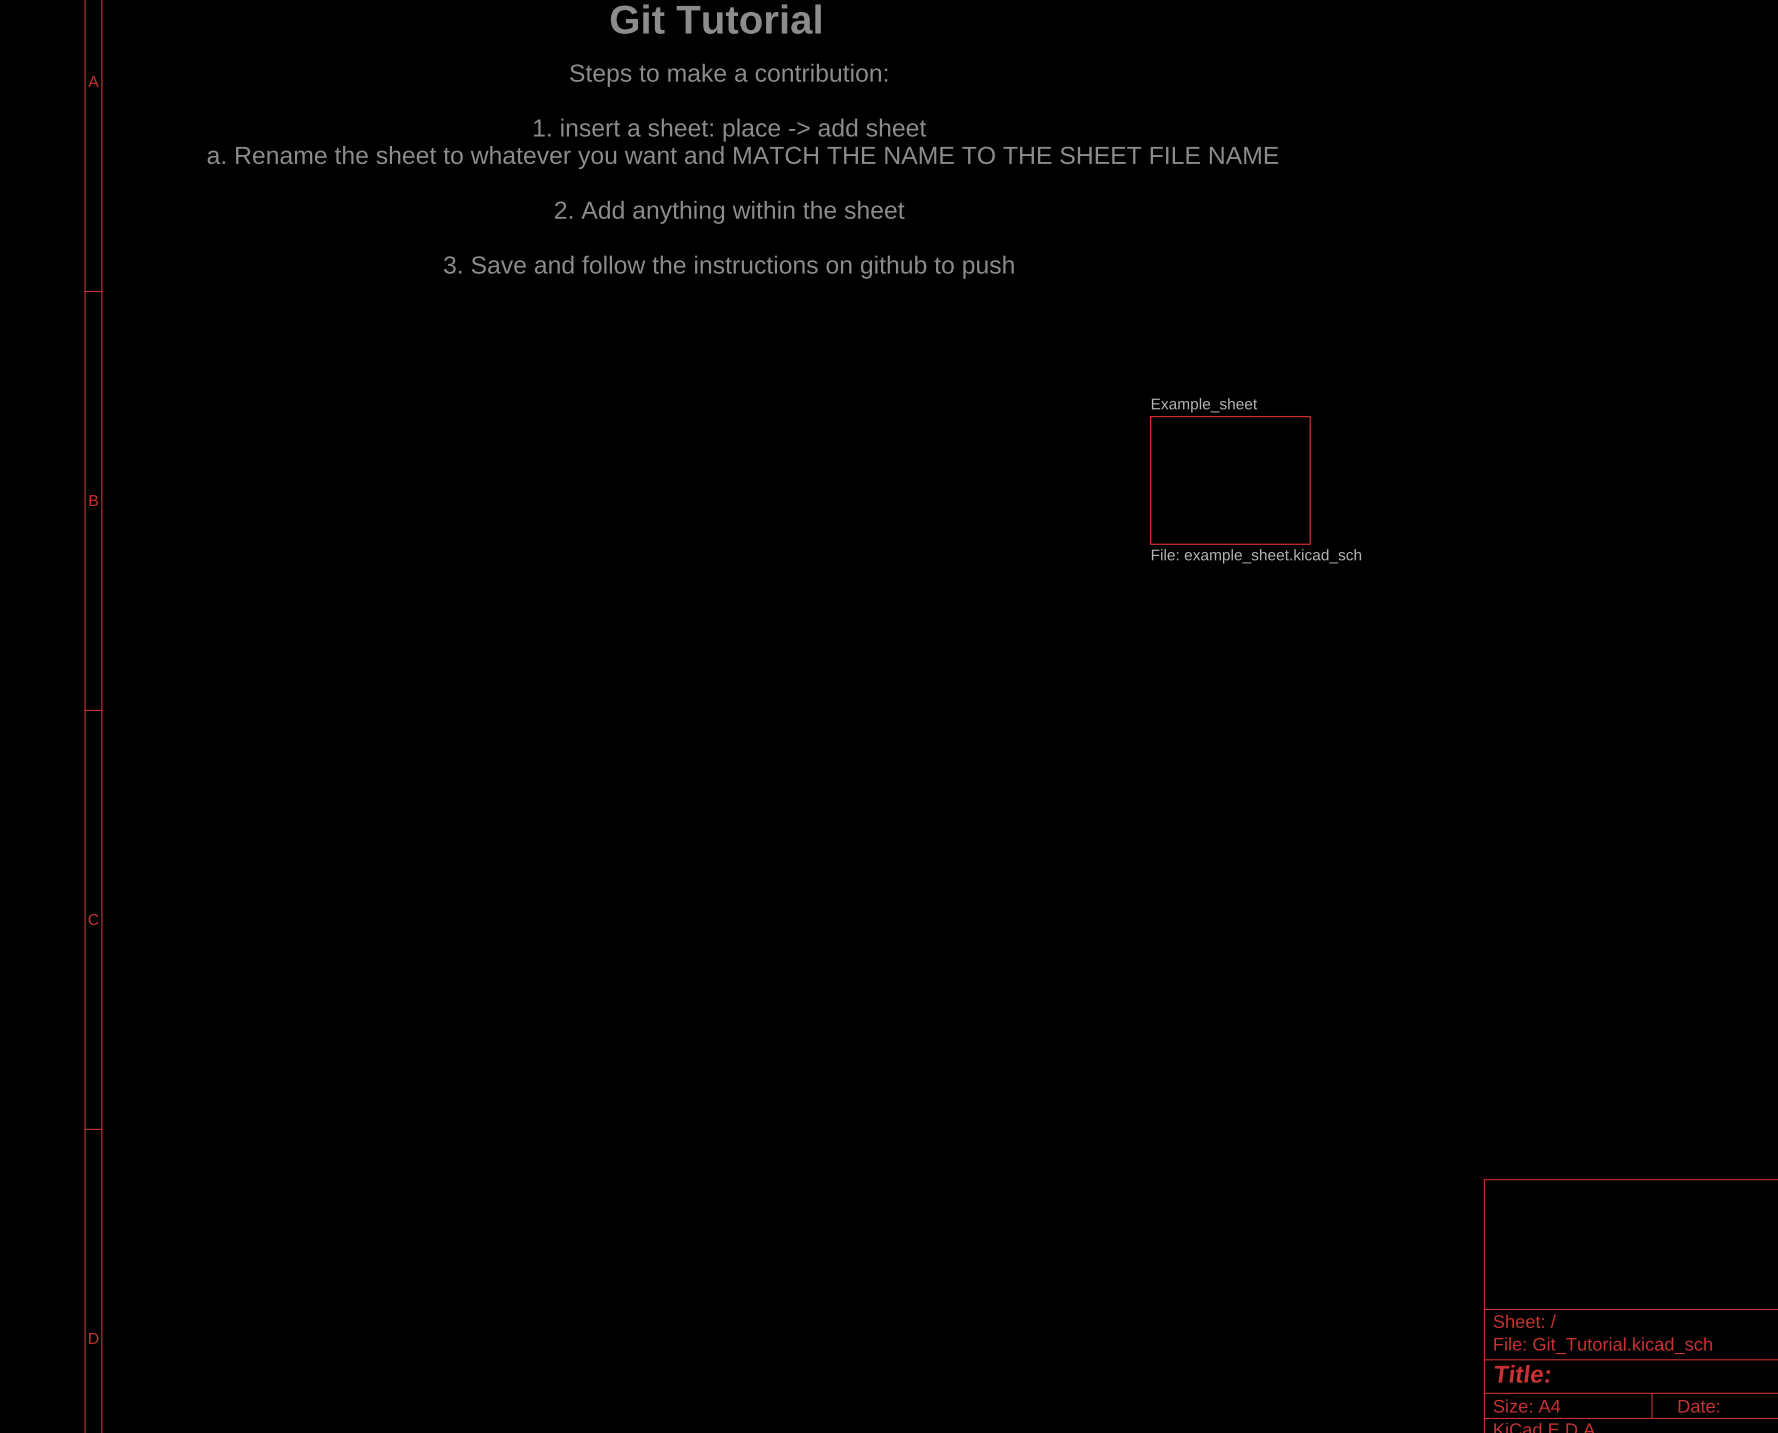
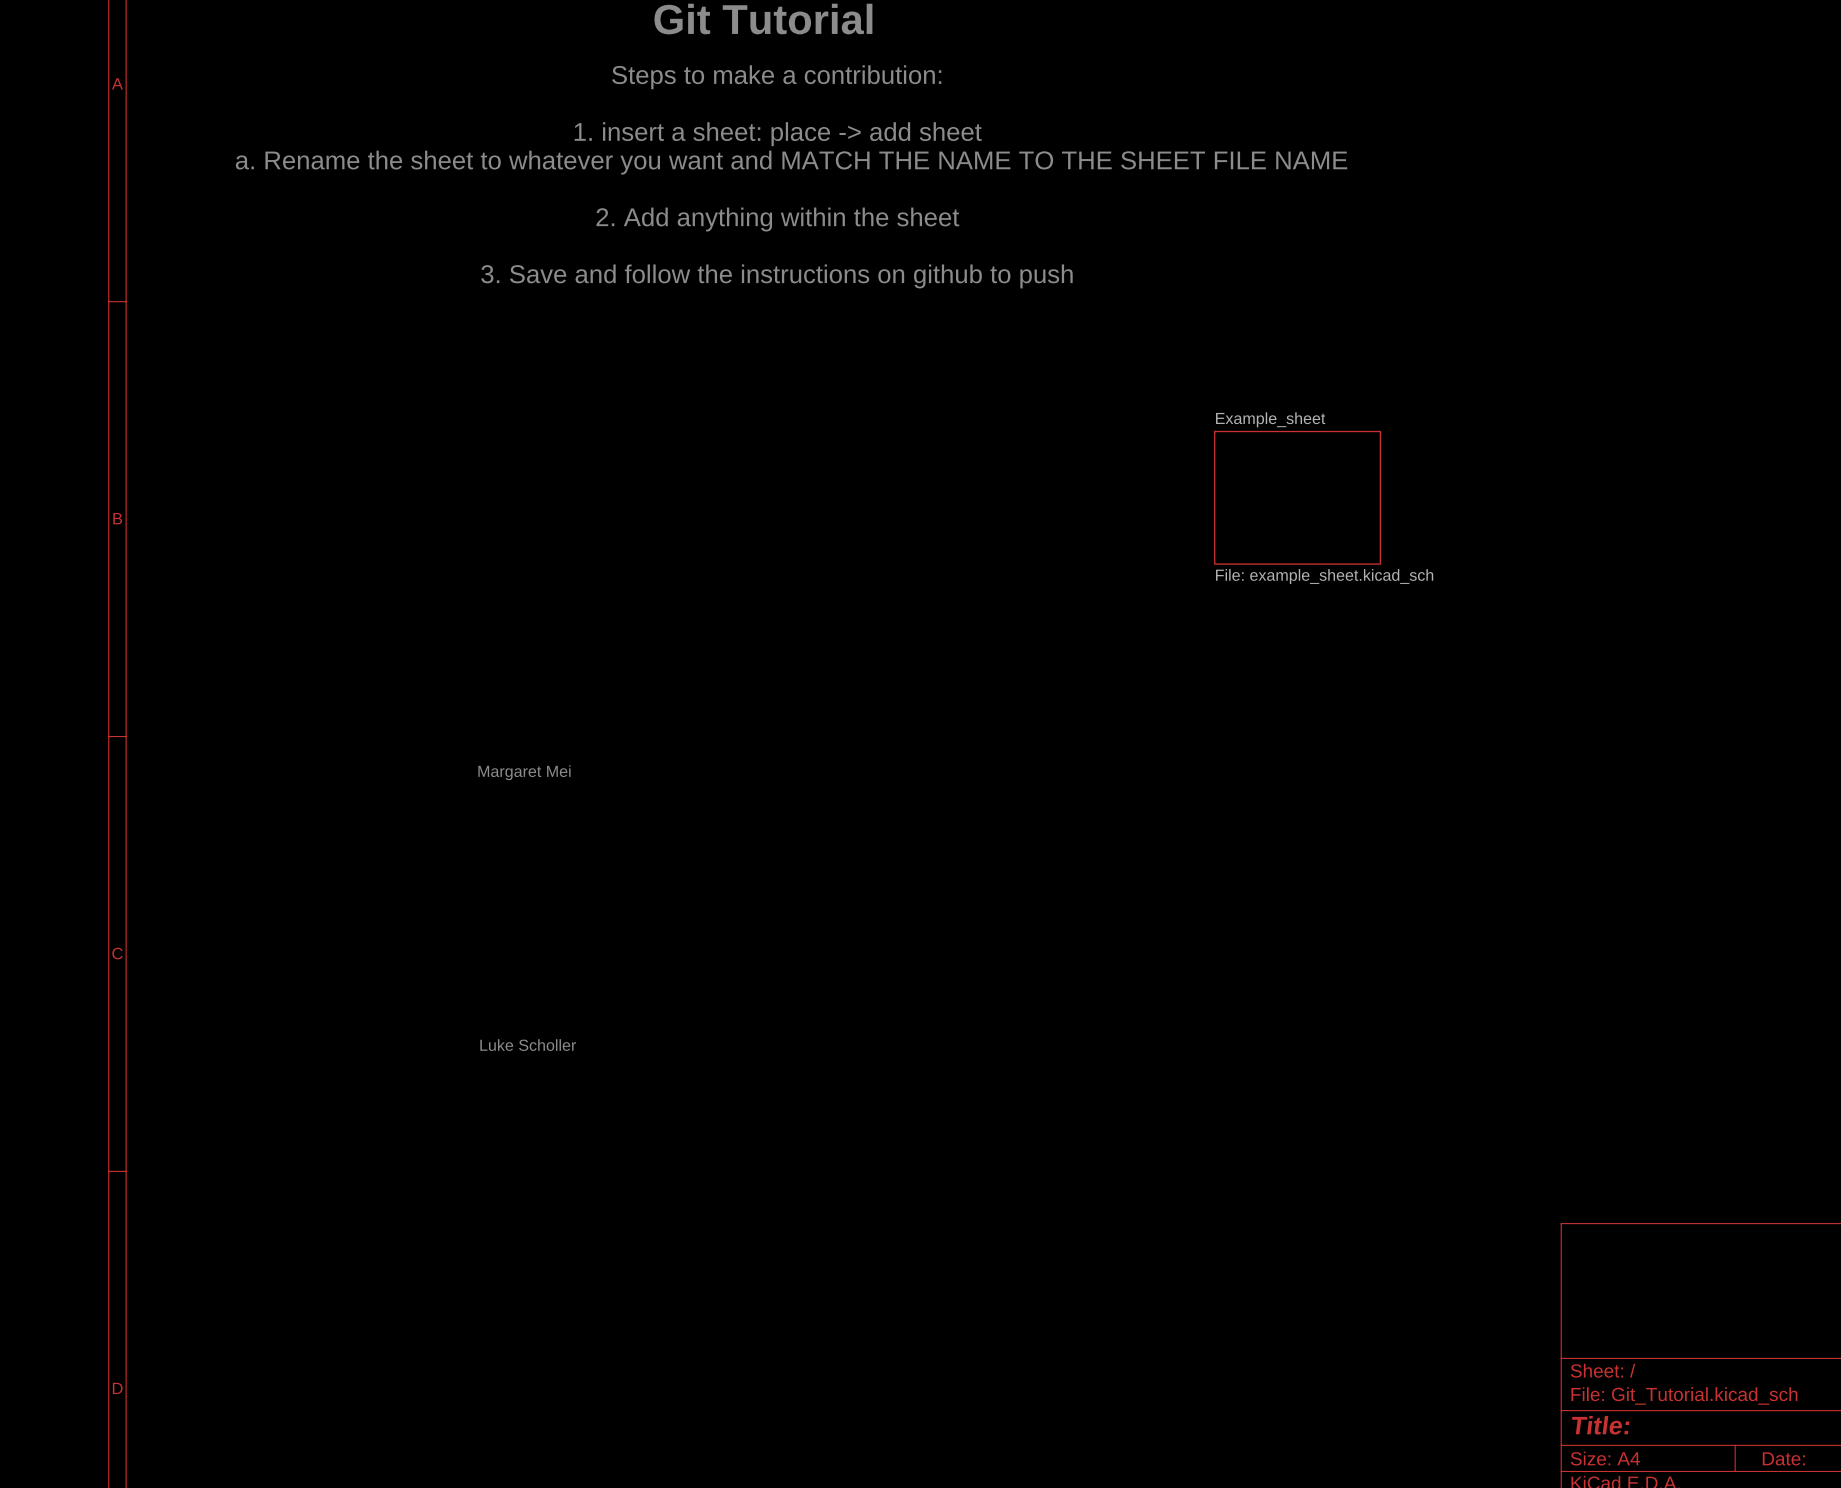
text: none -> Margaret Mei (524, 772)
text: none -> Luke Scholler (528, 1045)

